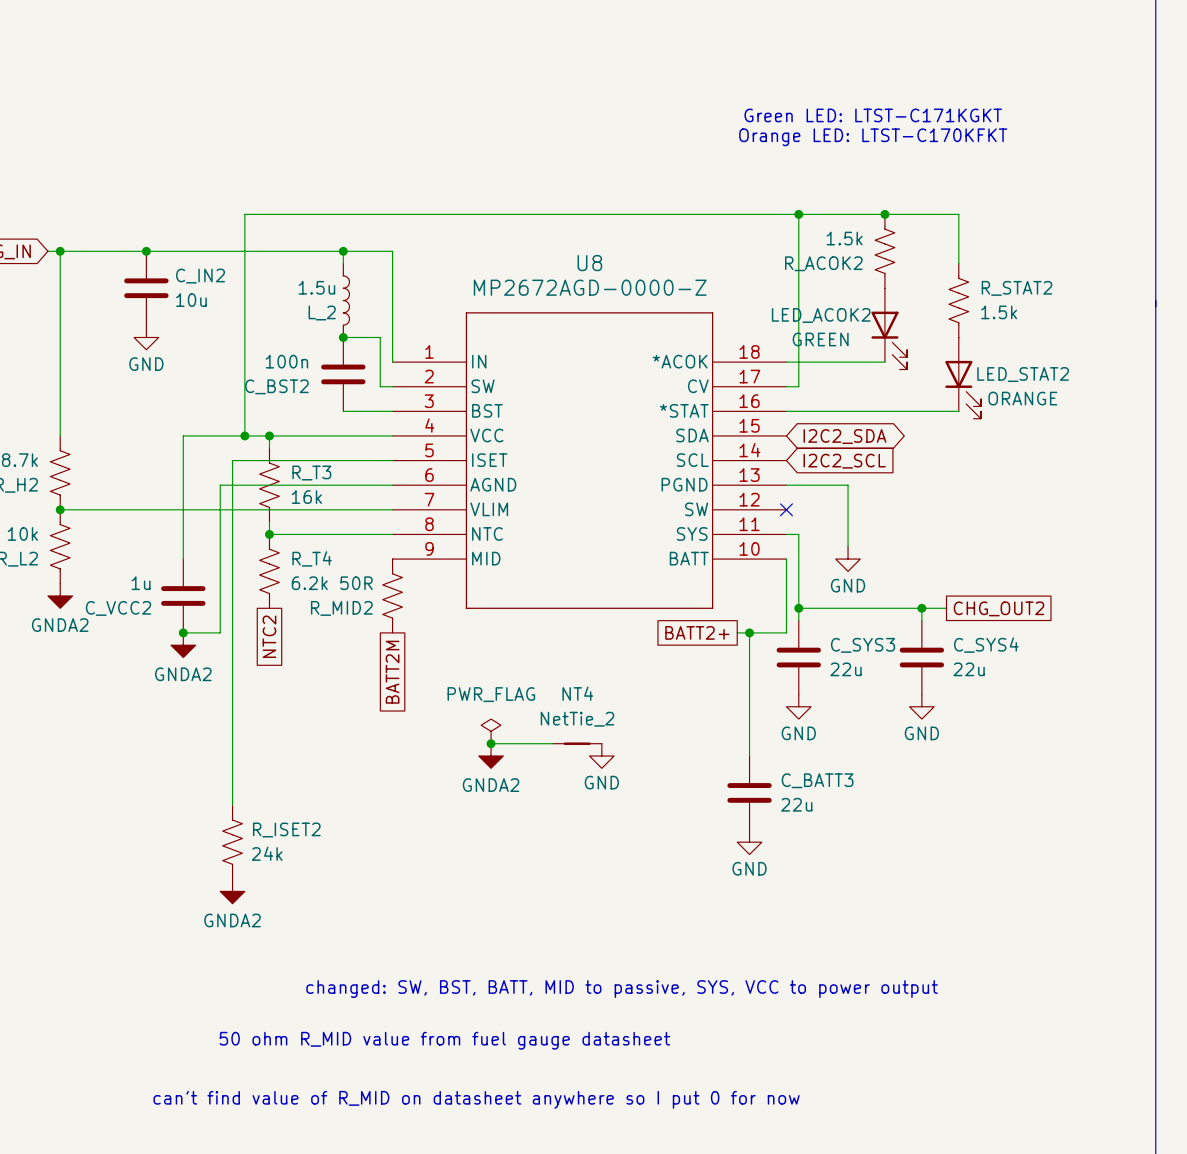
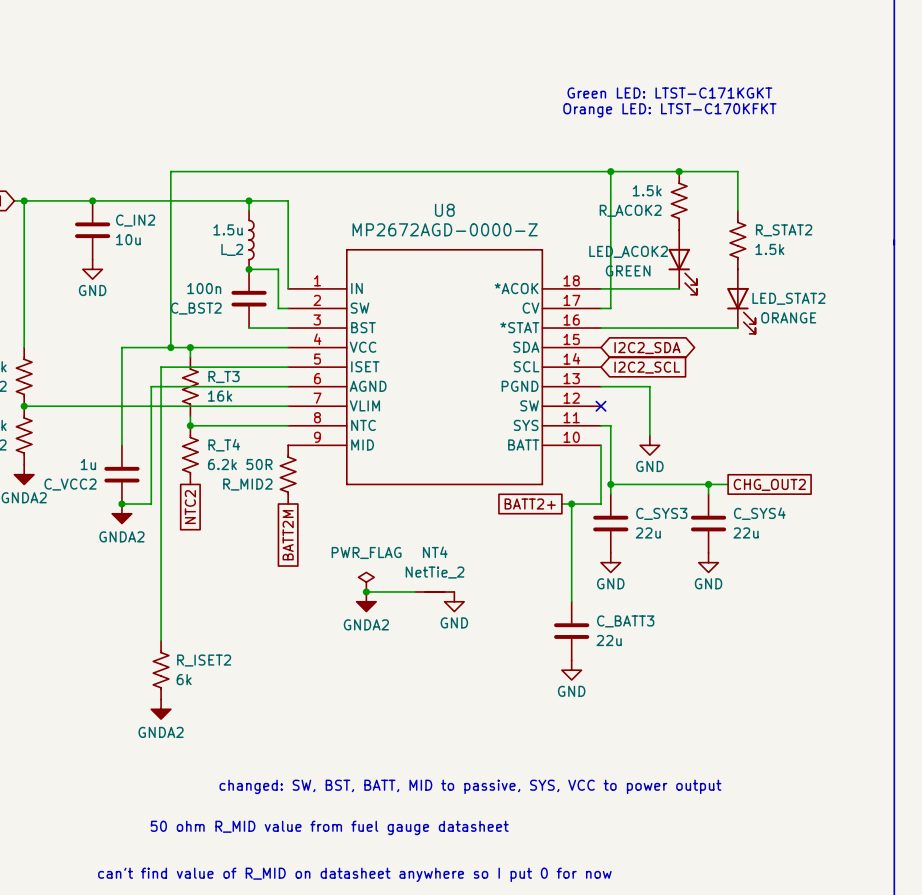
R_ISET2 value: 24k (267, 853) -> 6k (184, 679)

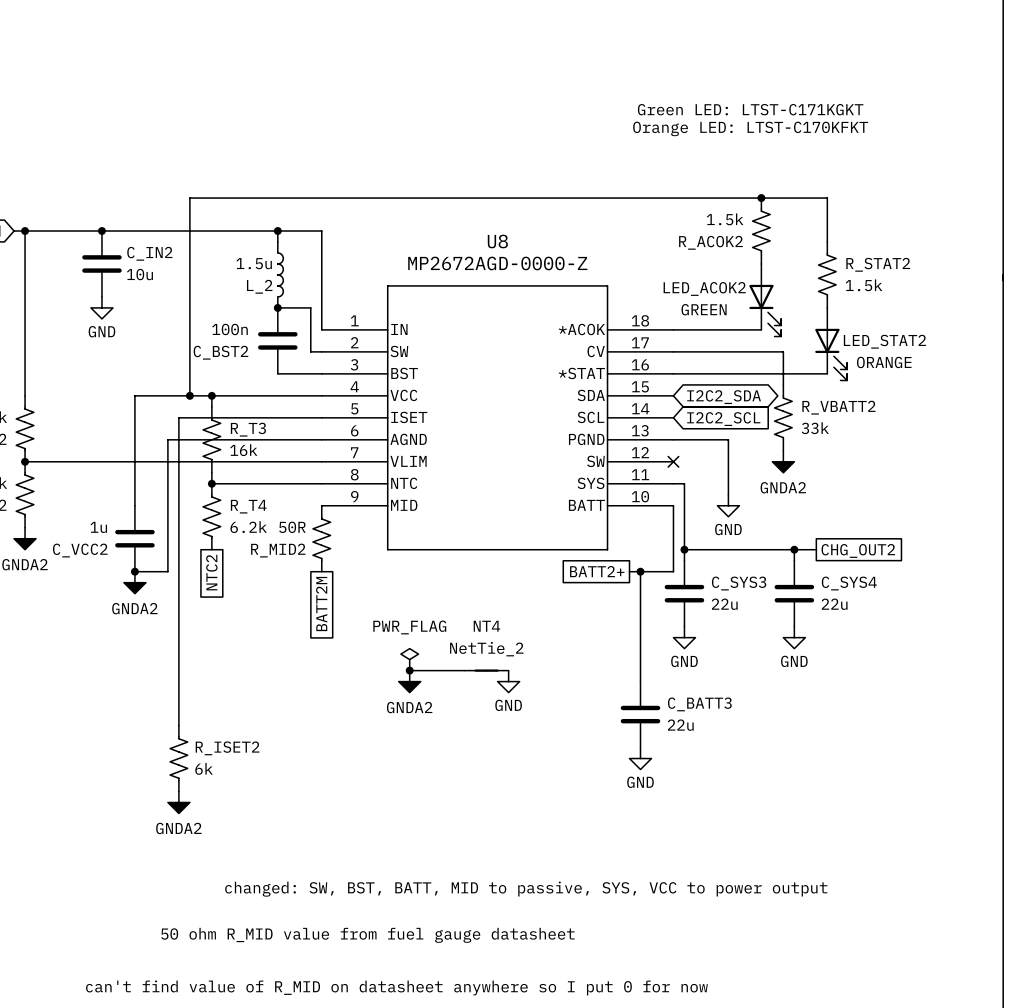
wire: (610, 171) (610, 308) -> (783, 384) (783, 351) (684, 351)
junction: (610, 171) -> none
R_VBATT2: none -> 33k (783, 417)
power symbol: none -> GNDA2 (783, 461)

